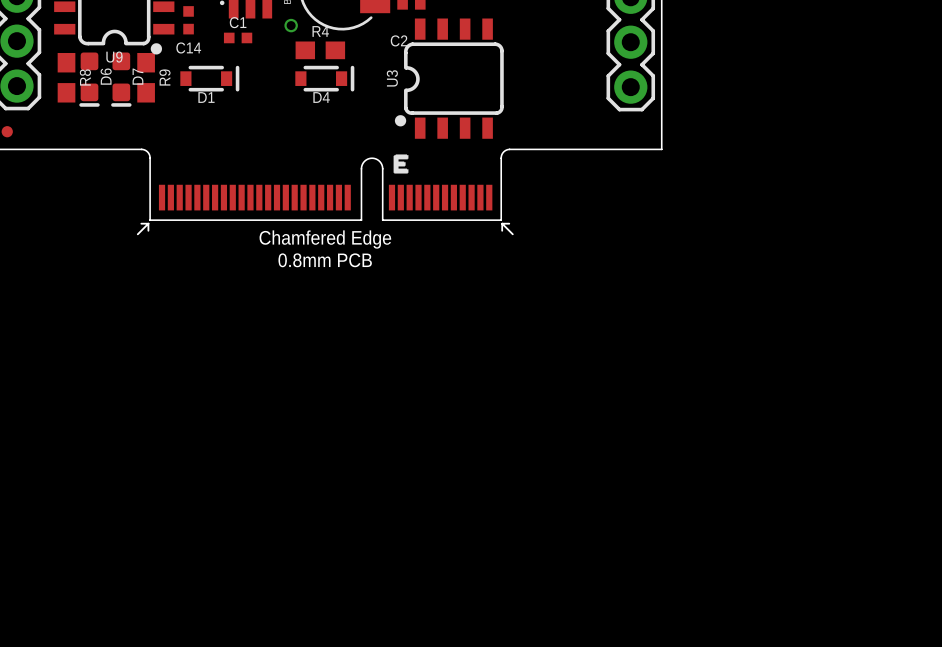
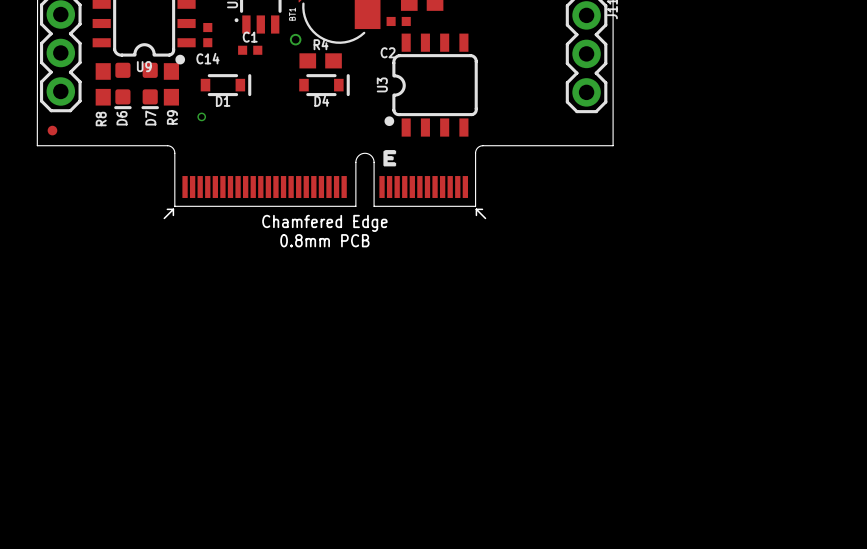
D6 name position: D6 (106, 76) -> D6 (122, 118)
D7 name position: D7 (137, 76) -> D7 (150, 118)
R8 name position: R8 (85, 77) -> R8 (101, 119)
R9 name position: R9 (164, 77) -> R9 (172, 117)
via: none -> (201, 116)

